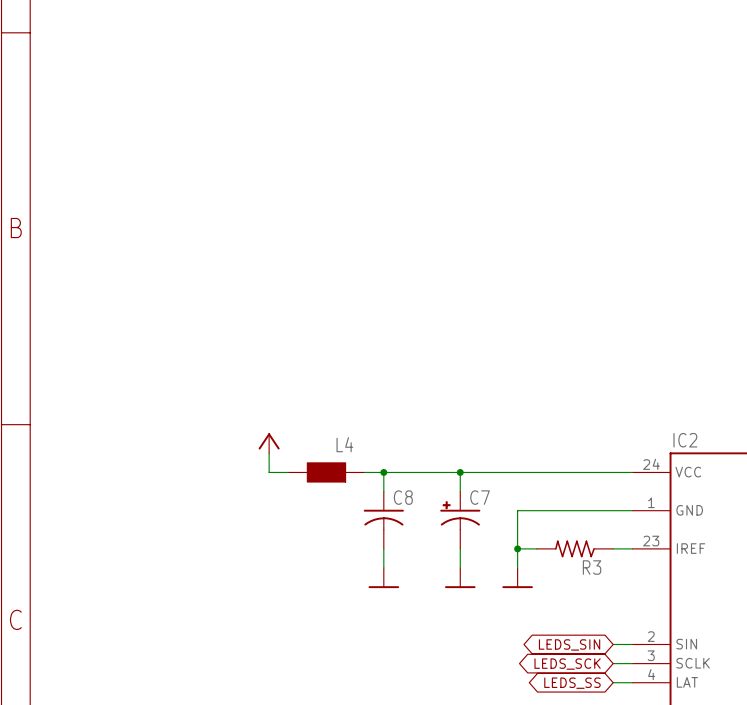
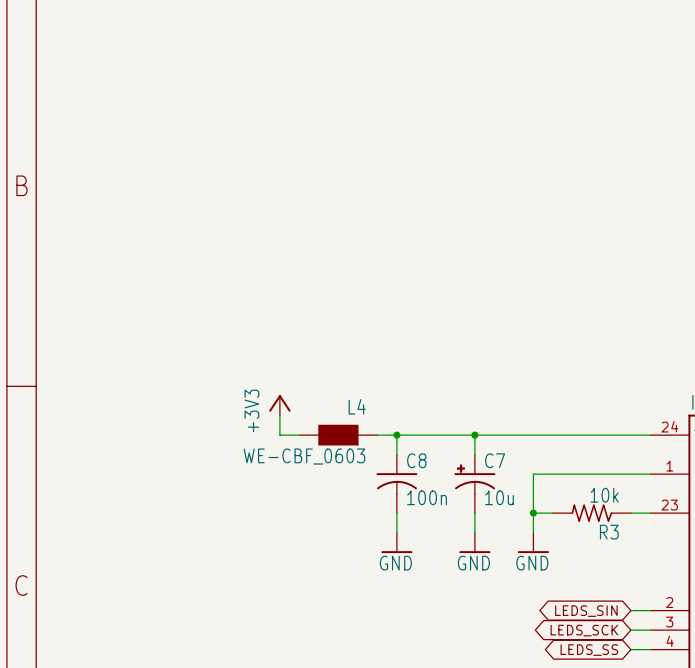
power symbol text: none -> +3V3 (251, 410)
L4 value: none -> WE-CBF_0603 (304, 456)
R3 value: none -> 10k (604, 495)
C8 value: none -> 100n (427, 497)
C7 value: none -> 10u (499, 497)
power symbol text: none -> GND (395, 563)
power symbol text: none -> GND (473, 563)
power symbol text: none -> GND (532, 563)

